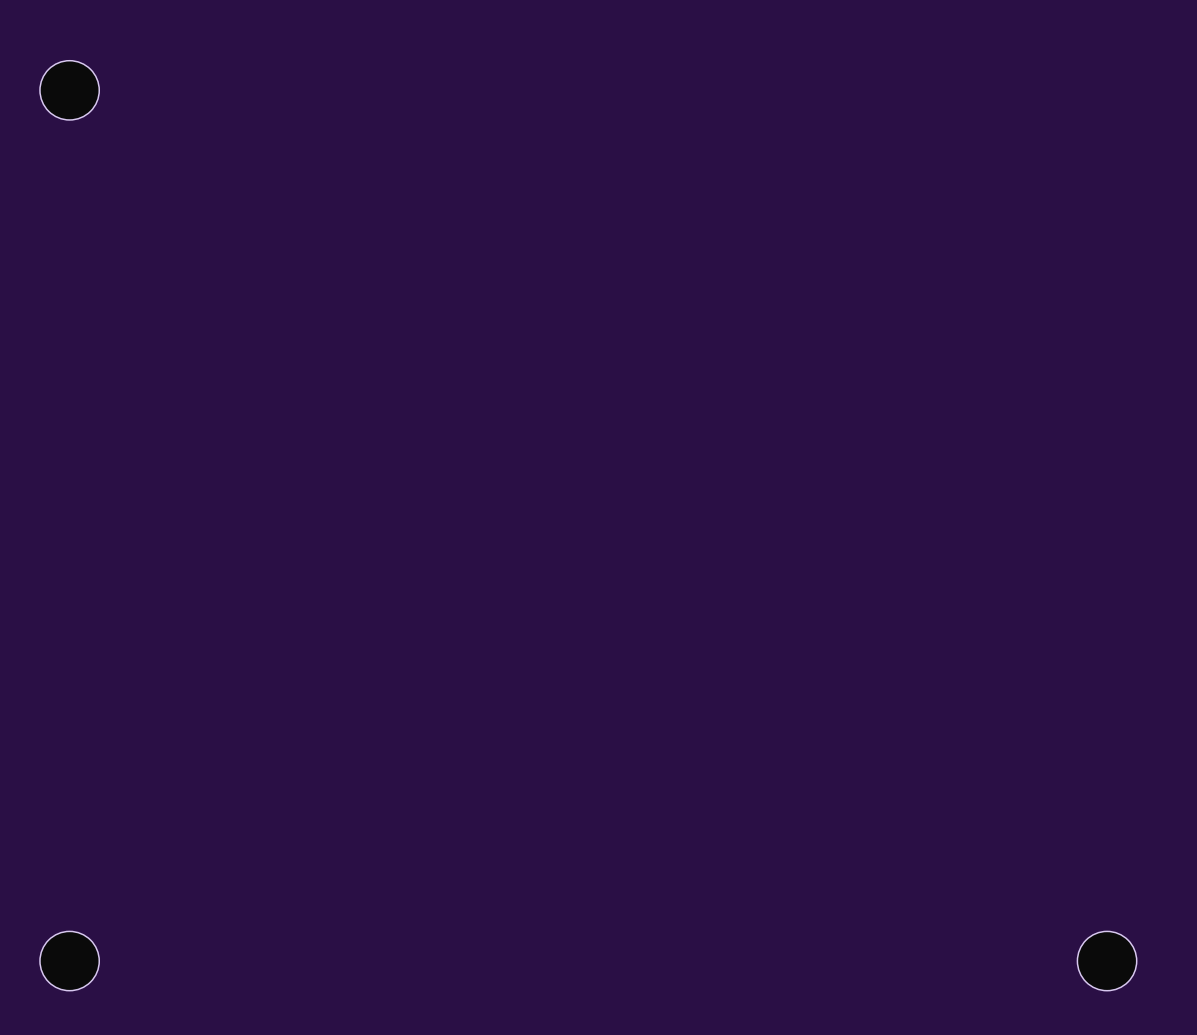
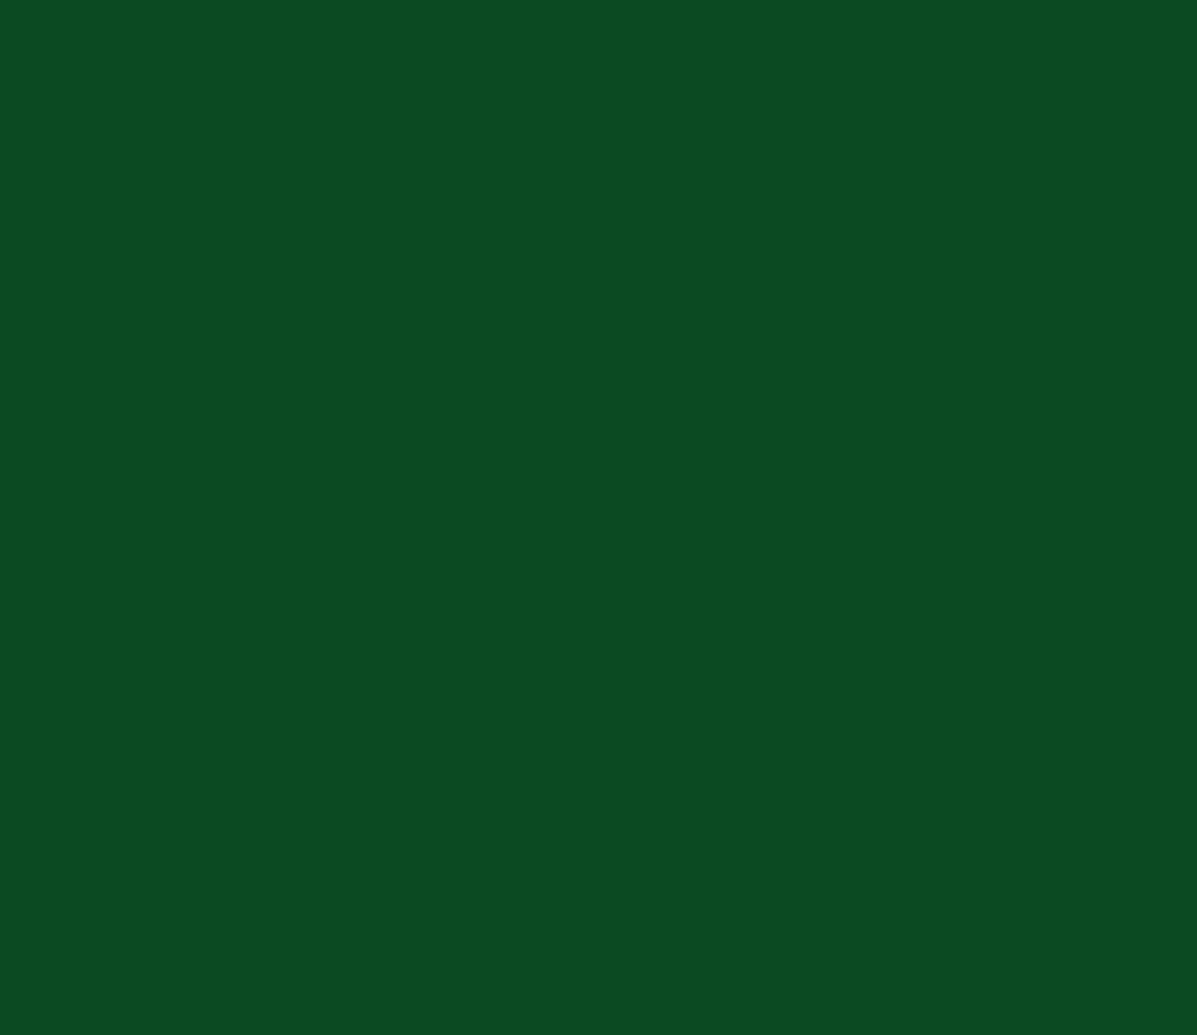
hole: (69, 90) -> none
hole: (69, 961) -> none
hole: (1107, 961) -> none

